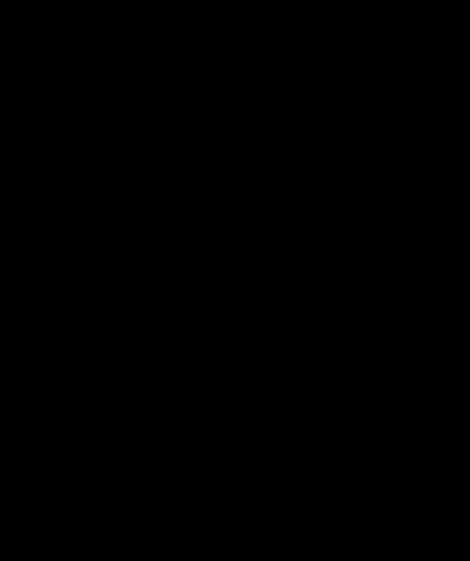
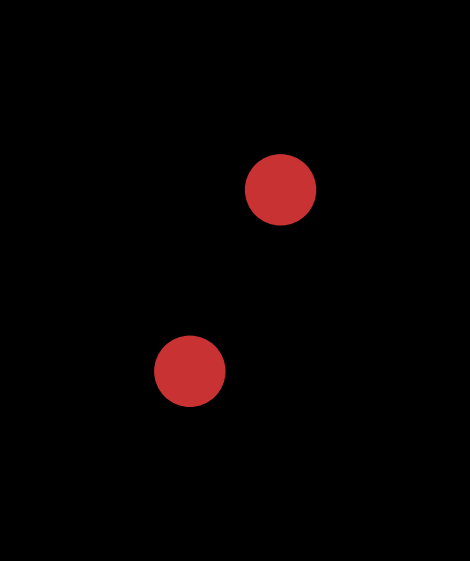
part: none -> (280, 189)
part: none -> (189, 371)

